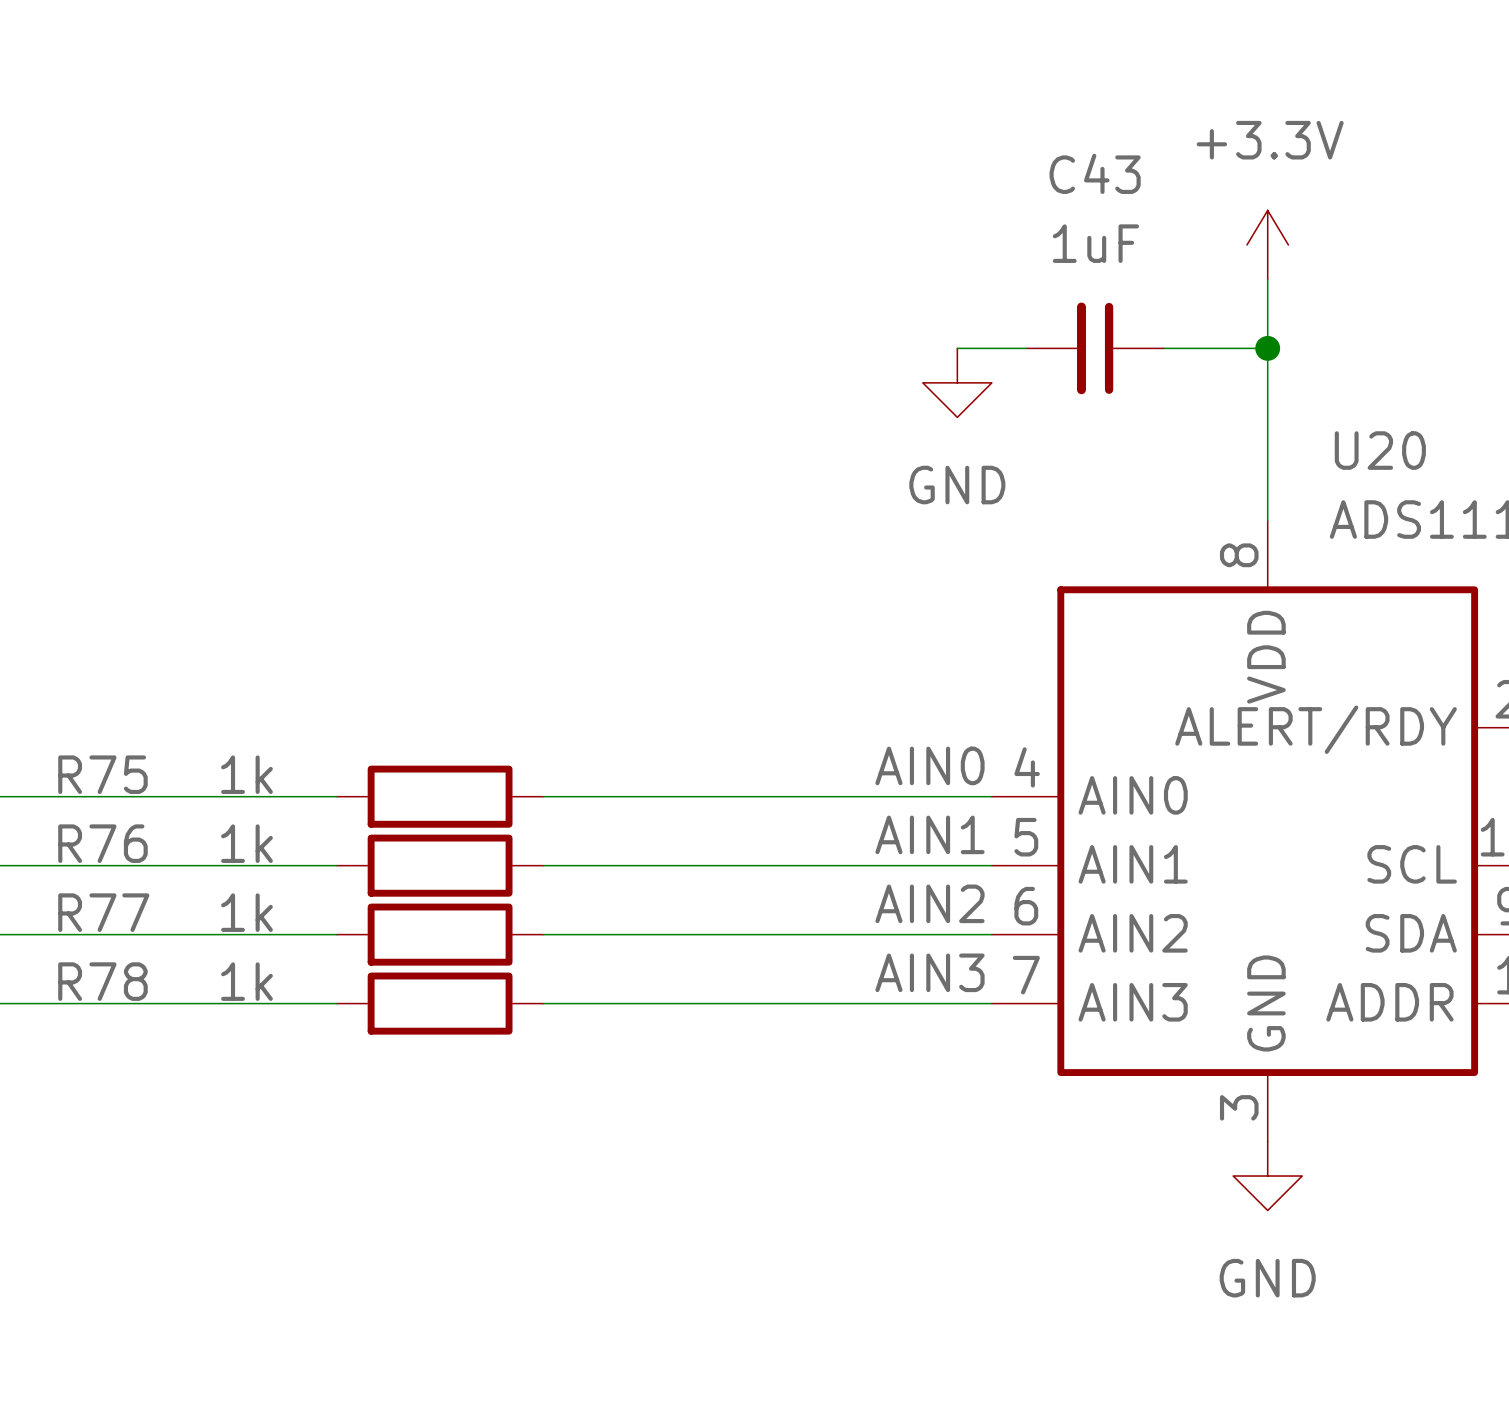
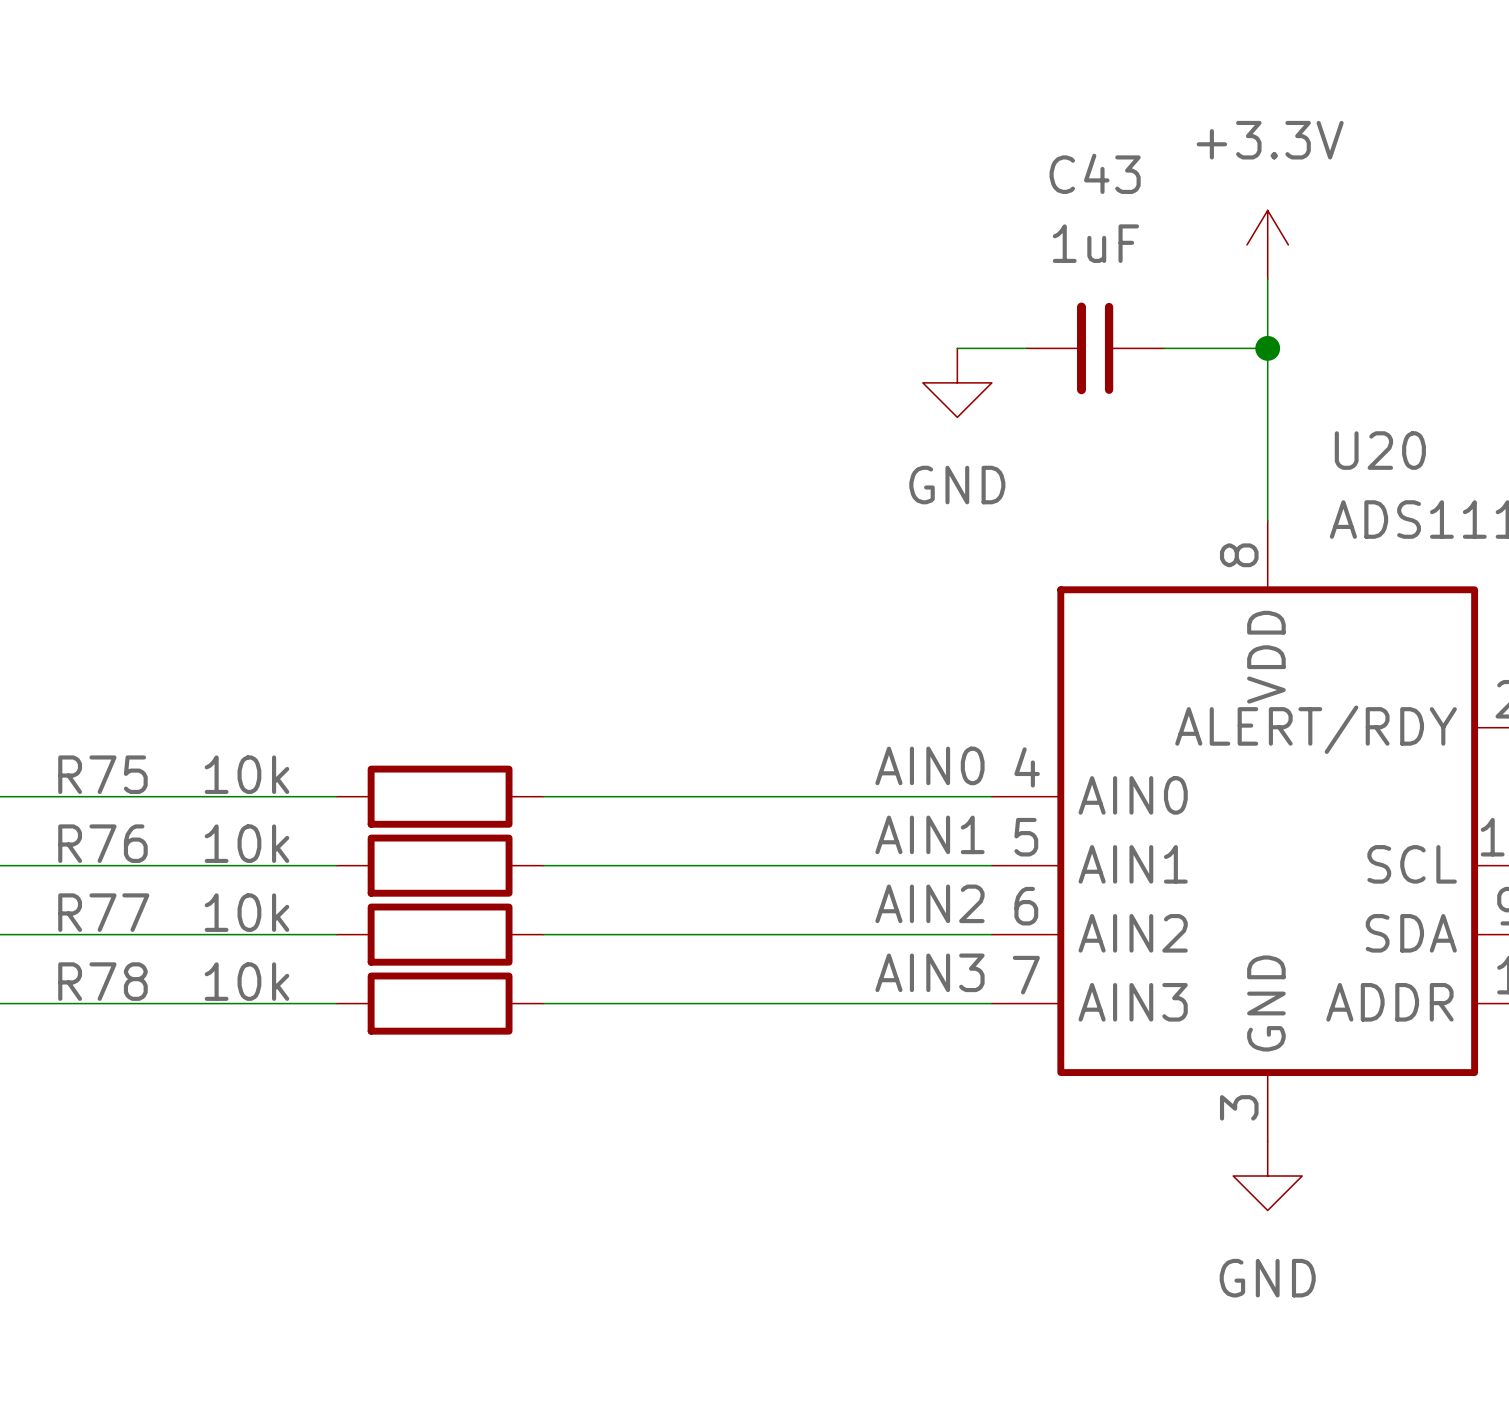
R75 value: 1k (246, 774) -> 10k (246, 774)
R76 value: 1k (246, 843) -> 10k (246, 843)
R77 value: 1k (246, 912) -> 10k (246, 912)
R78 value: 1k (246, 981) -> 10k (246, 981)

